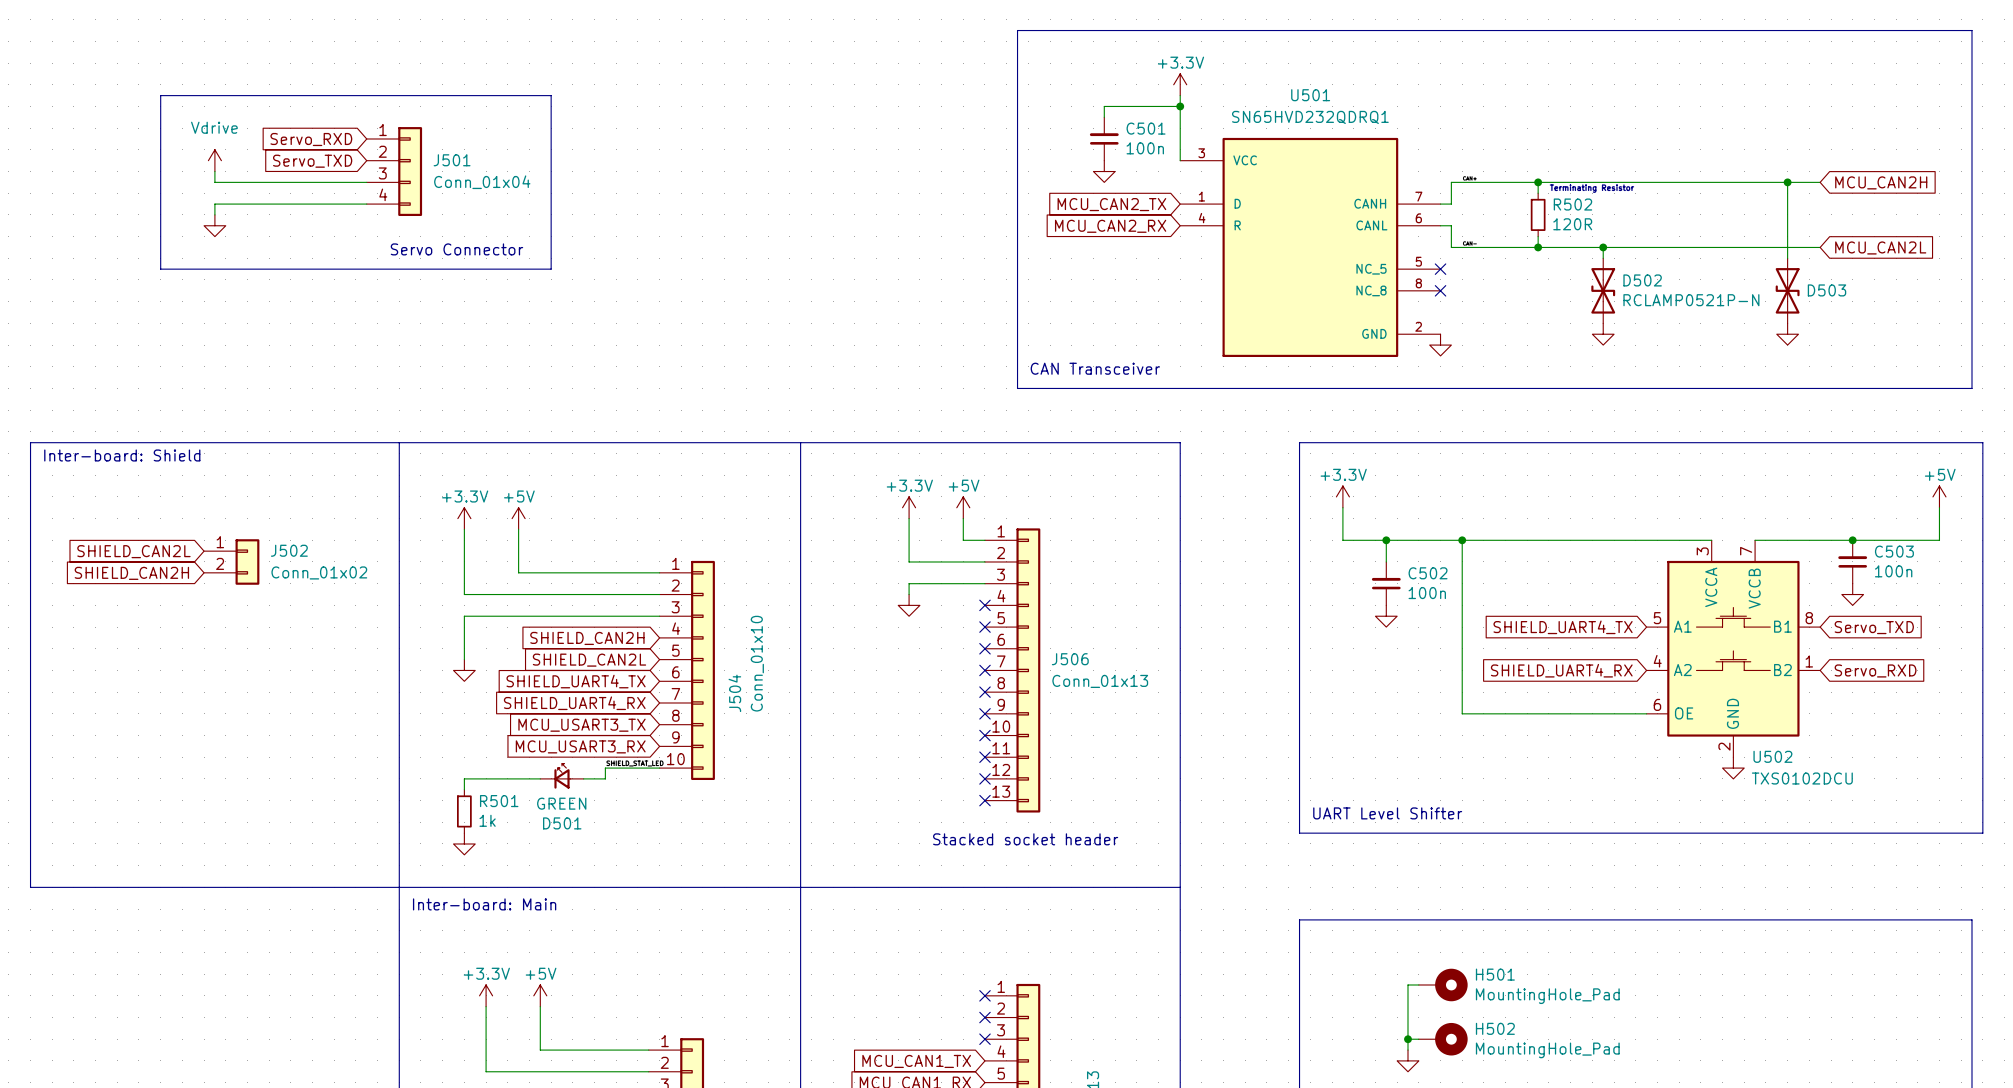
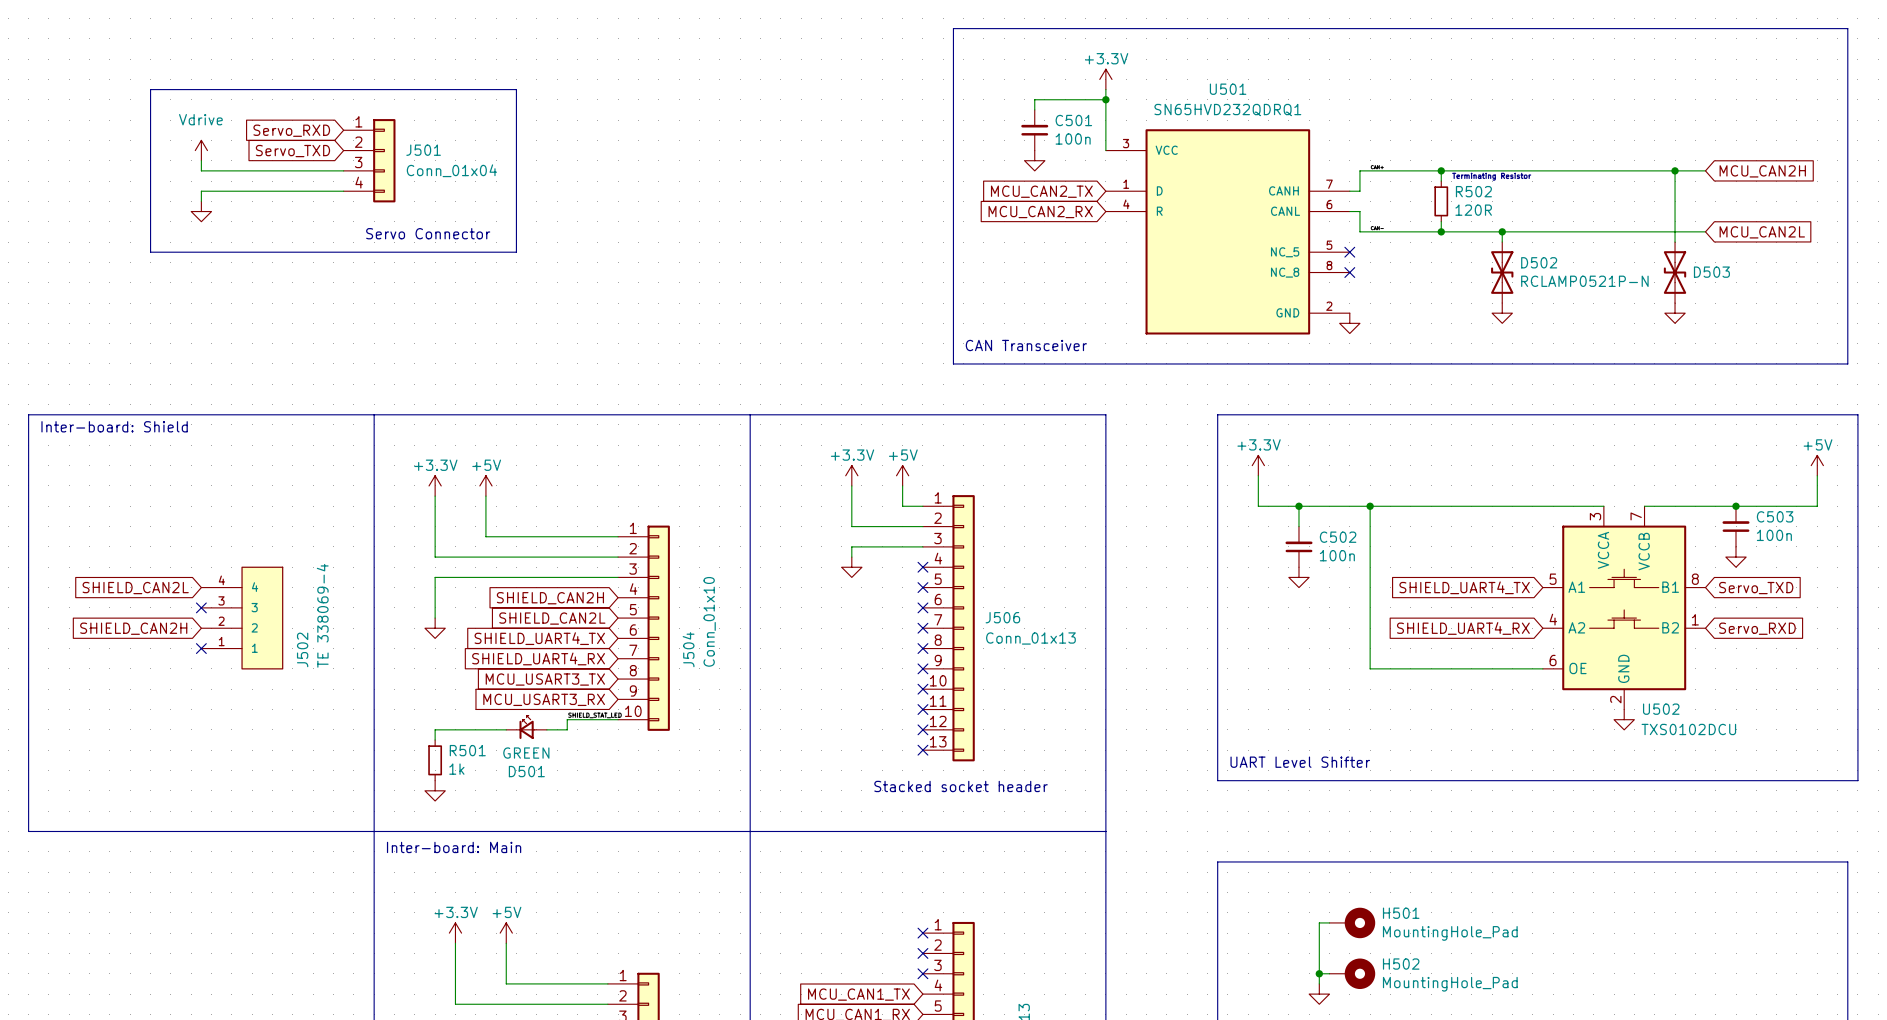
J502 symbol: [204, 539, 260, 585] -> [201, 566, 284, 670]
J502 name position: J502 (289, 550) -> J502 (302, 649)
global label position: SHIELD_CAN2L (133, 551) -> SHIELD_CAN2L (135, 588)
J502 value: Conn_01x02 (319, 572) -> TE 338069-4 (322, 615)
global label position: SHIELD_CAN2H (131, 573) -> SHIELD_CAN2H (133, 628)
no-connect mark: none -> (201, 607)
no-connect mark: none -> (201, 648)

